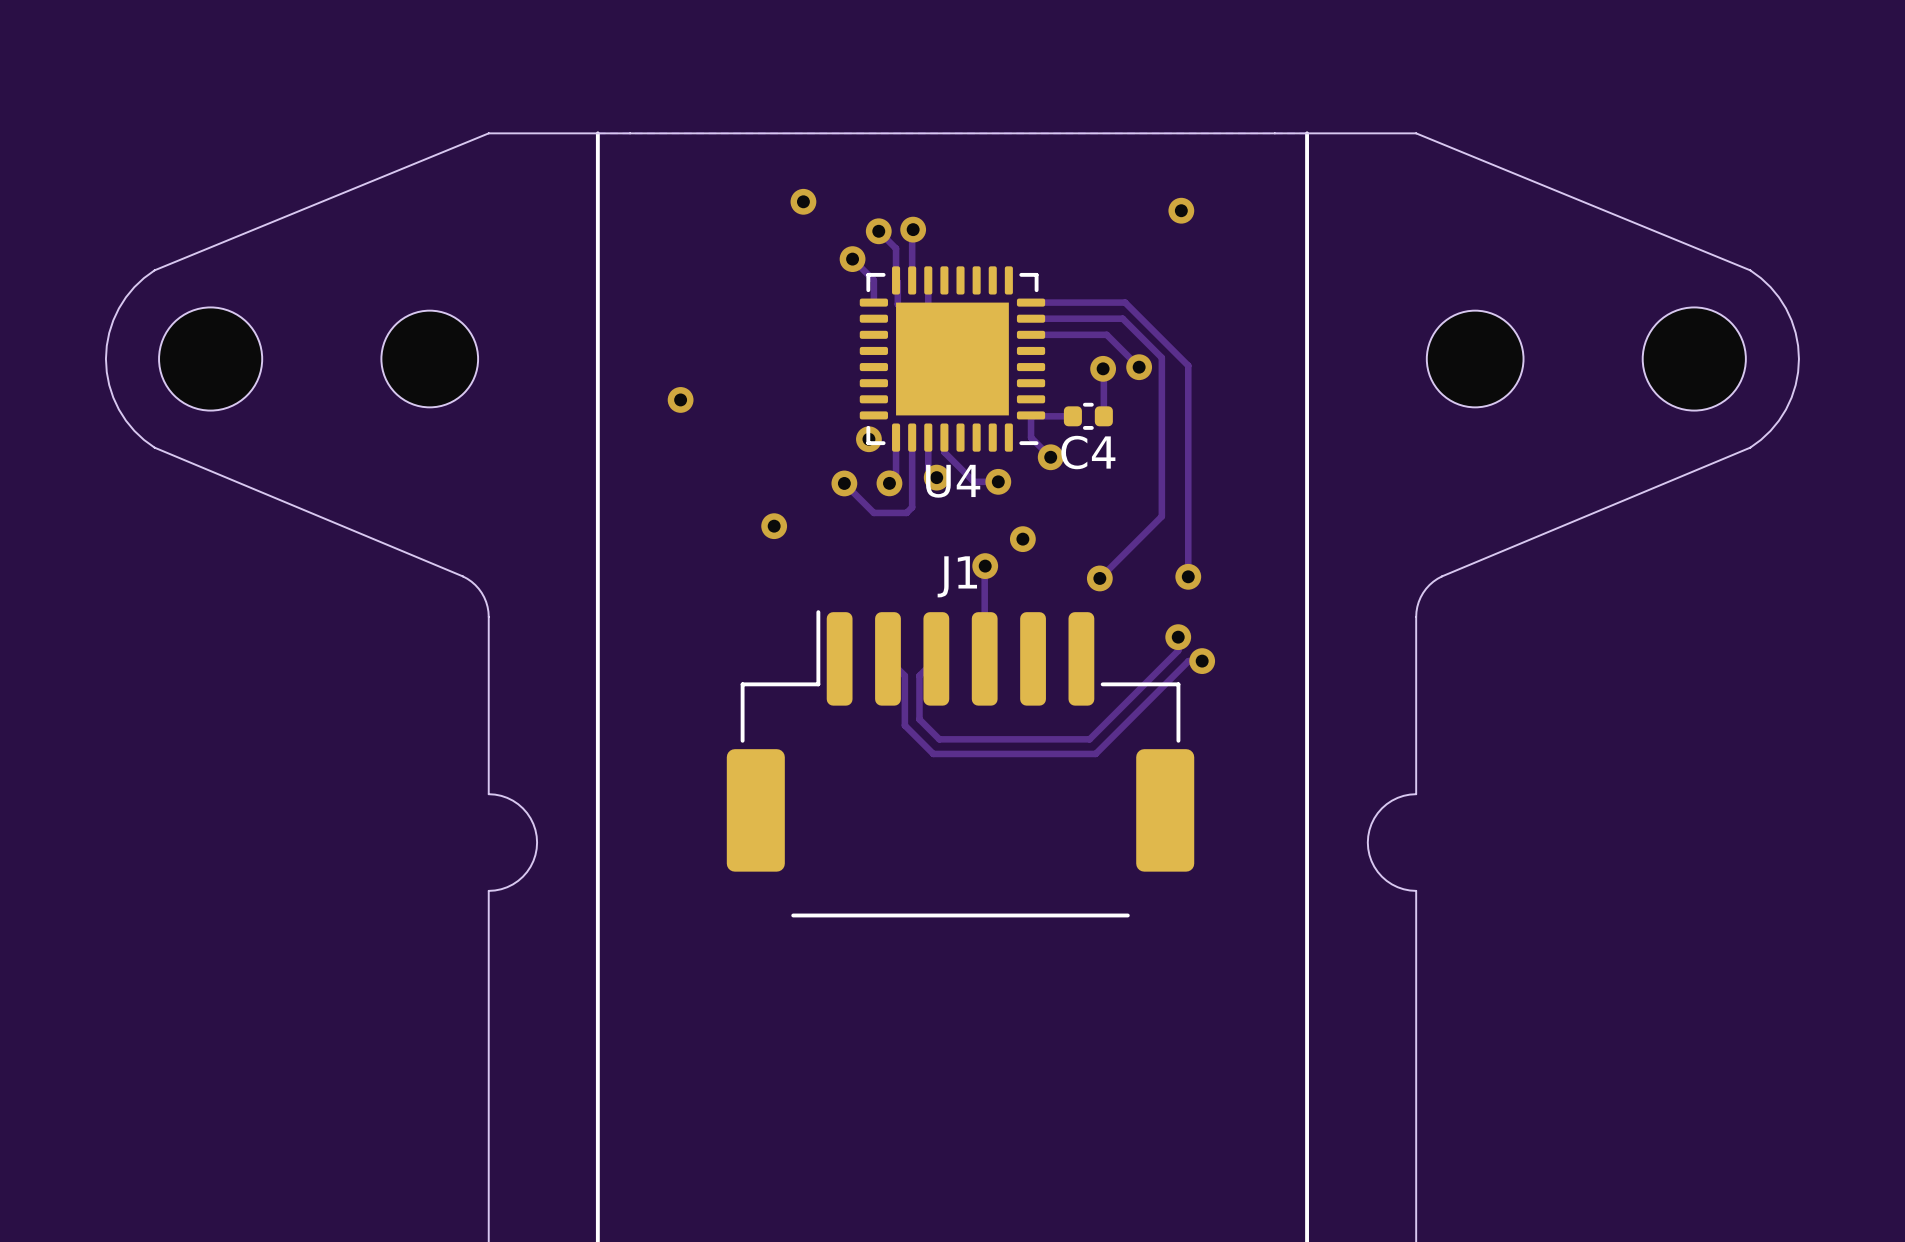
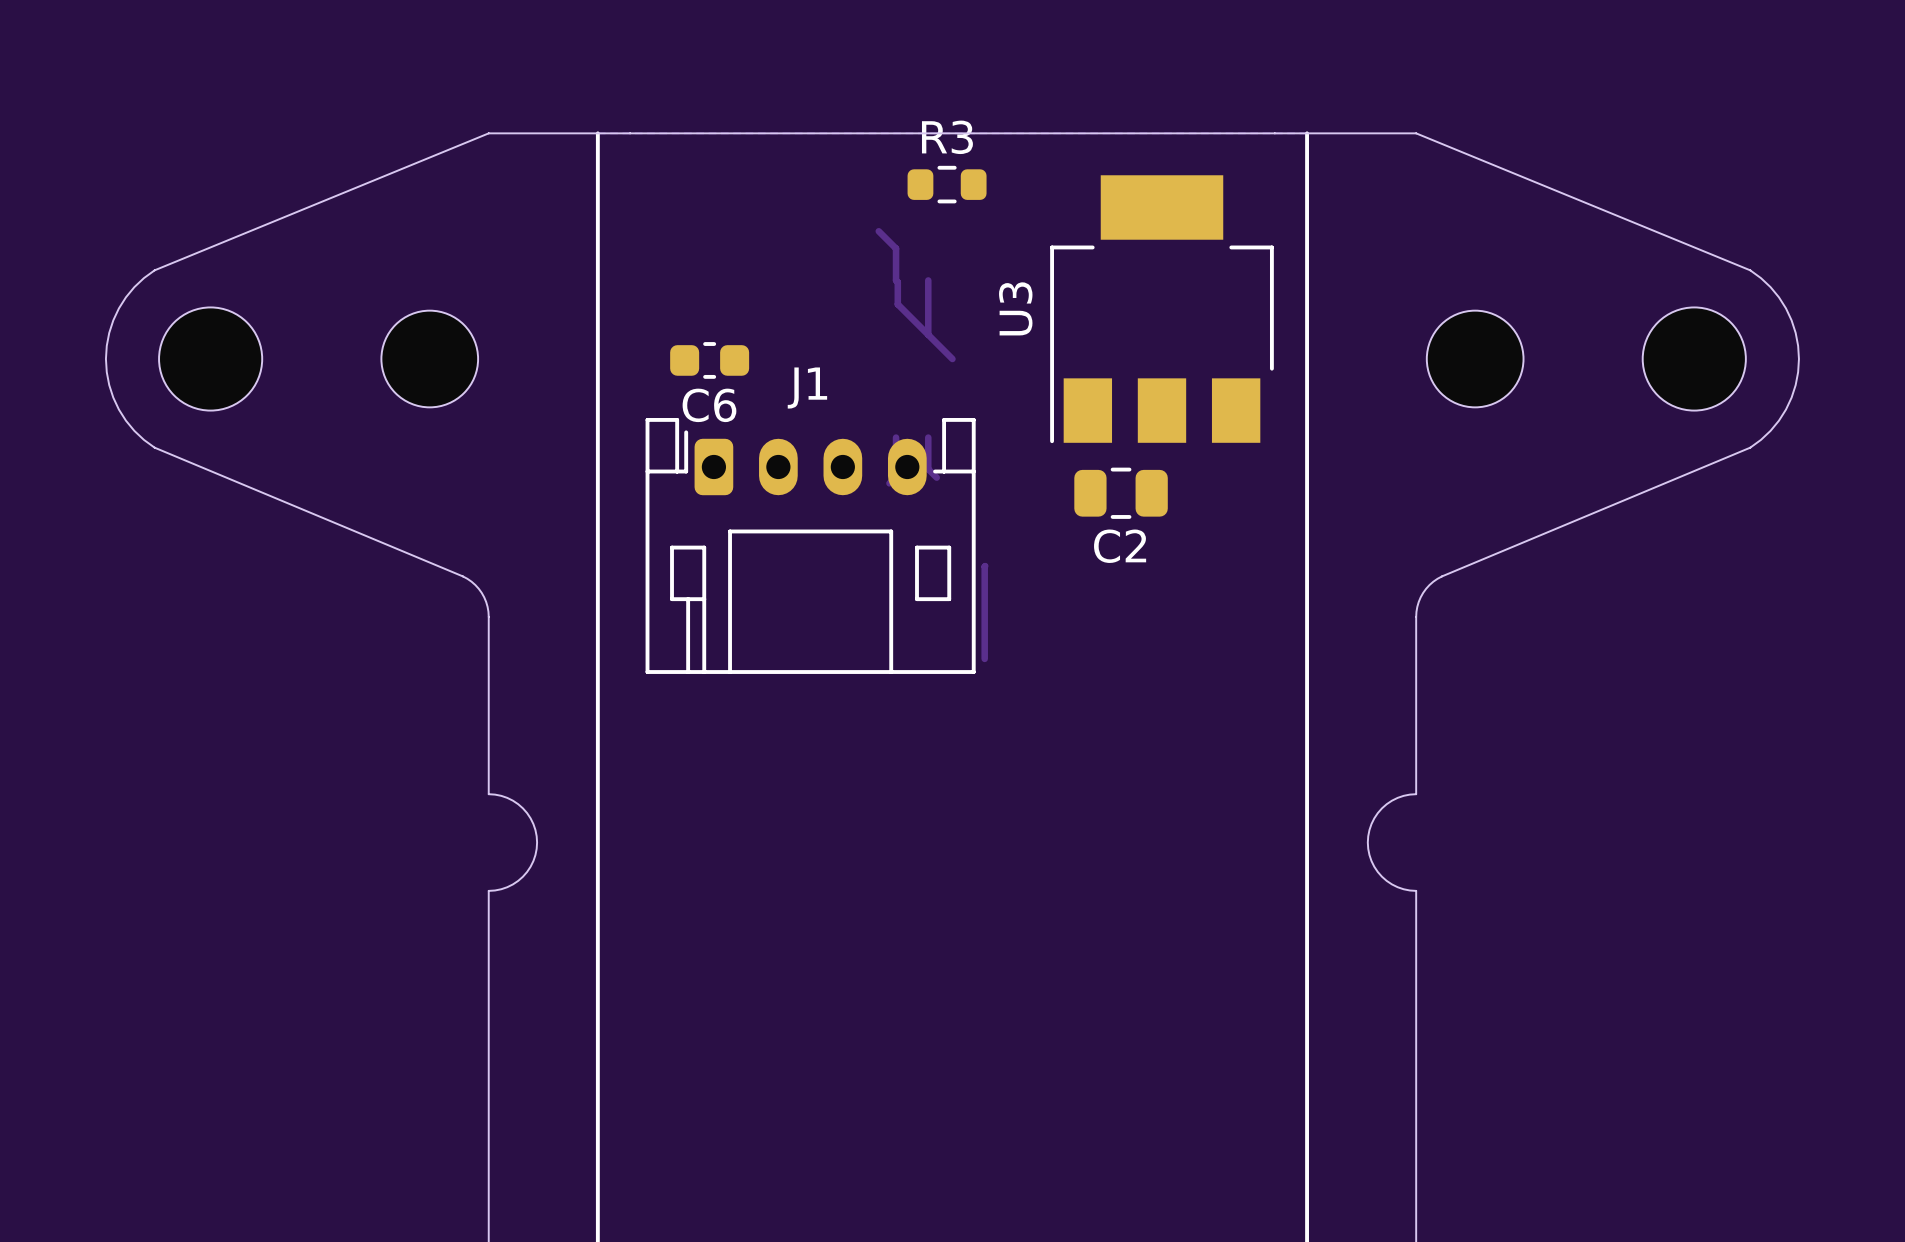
R3: none -> (947, 184)
via: (803, 201) -> none
via: (1181, 210) -> none
track: (913, 229) (912, 280) -> none
via: (913, 229) -> none
via: (878, 231) -> none
track: (852, 259) (873, 280) (873, 302) -> none
via: (852, 259) -> none
track: (1031, 302) (1125, 302) (1188, 365) (1188, 576) -> none
U3: none -> (1161, 309)
track: (1031, 318) (1122, 318) (1161, 357) (1161, 516) (1099, 578) -> none
track: (1031, 334) (1106, 334) (1139, 367) -> none
U4: (952, 359) -> none
C6: none -> (709, 360)
via: (1139, 367) -> none
track: (1103, 368) (1103, 416) -> none
via: (1103, 368) -> none
via: (680, 399) -> none
track: (1072, 416) (1031, 415) (1031, 437) (1050, 457) -> none
C4: (1088, 416) -> none
track: (912, 437) (912, 507) (906, 512) (873, 512) (844, 483) -> none
track: (944, 437) (944, 452) (973, 481) (998, 481) -> none
via: (868, 439) -> none
via: (1050, 457) -> none
via: (936, 477) -> none
via: (998, 481) -> none
via: (844, 483) -> none
via: (889, 483) -> none
C2: none -> (1121, 493)
via: (774, 526) -> none
via: (1022, 539) -> none
via: (985, 566) -> none
via: (1188, 576) -> none
via: (1099, 578) -> none
J1 footprint: [726, 610, 1195, 918] -> [645, 417, 976, 674]
track: (1178, 637) (1178, 650) (1089, 739) (939, 739) (919, 719) (919, 675) (936, 658) -> none
via: (1178, 637) -> none
track: (887, 658) (904, 675) (904, 725) (933, 753) (1095, 753) (1188, 661) (1202, 661) -> none
via: (1202, 661) -> none

